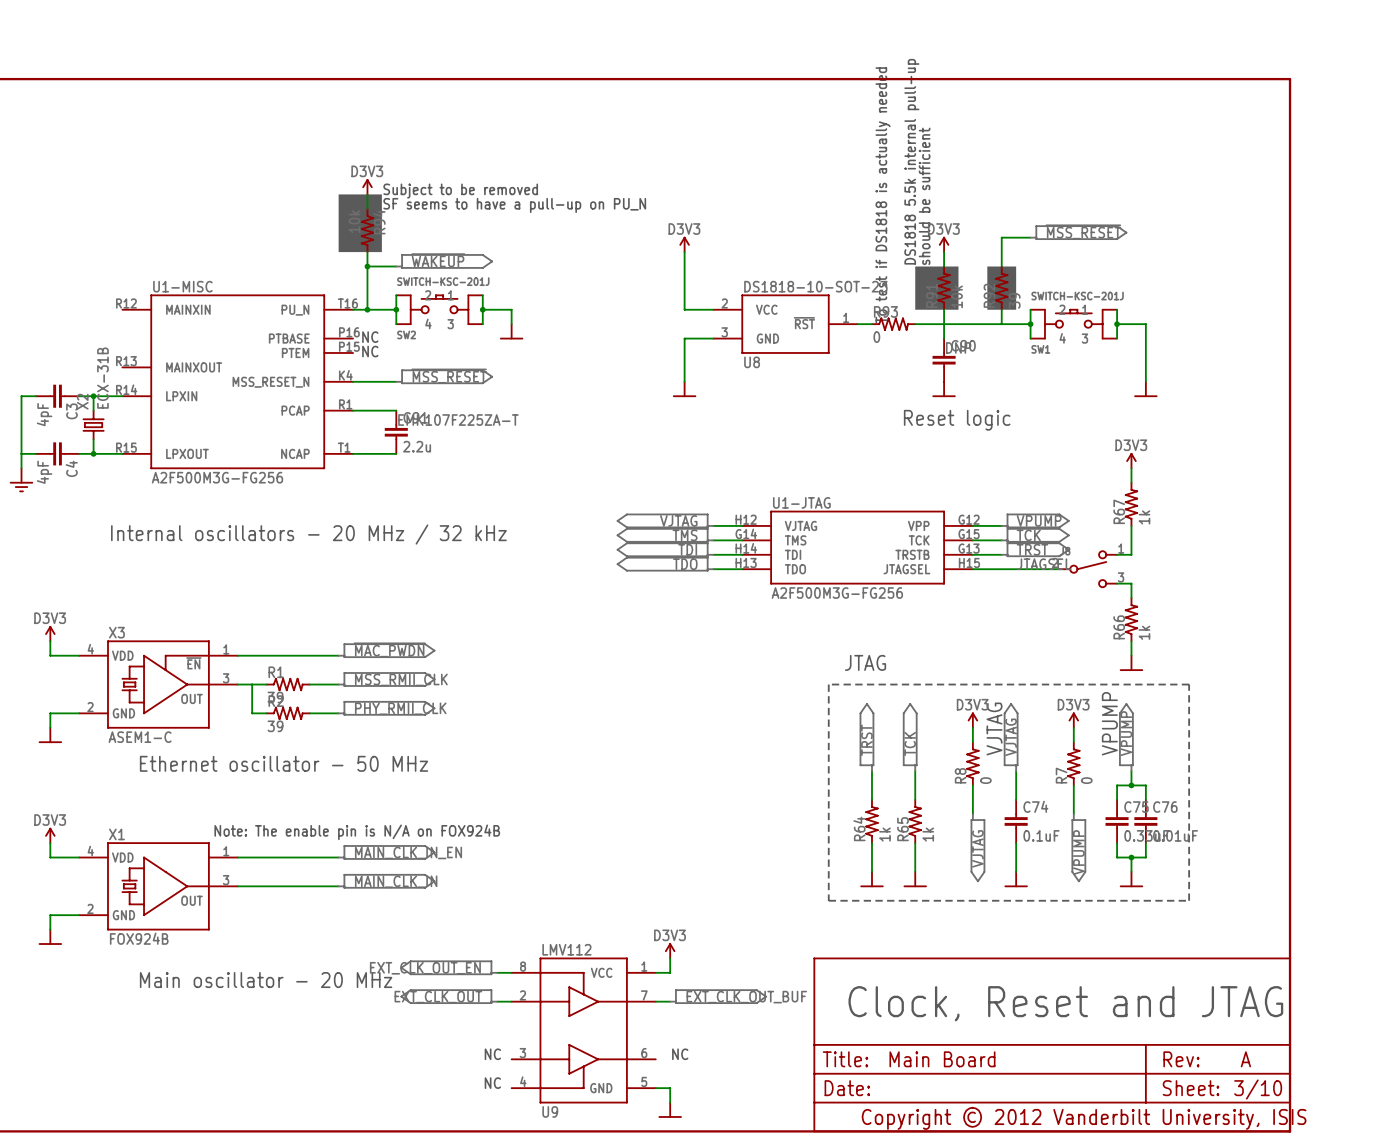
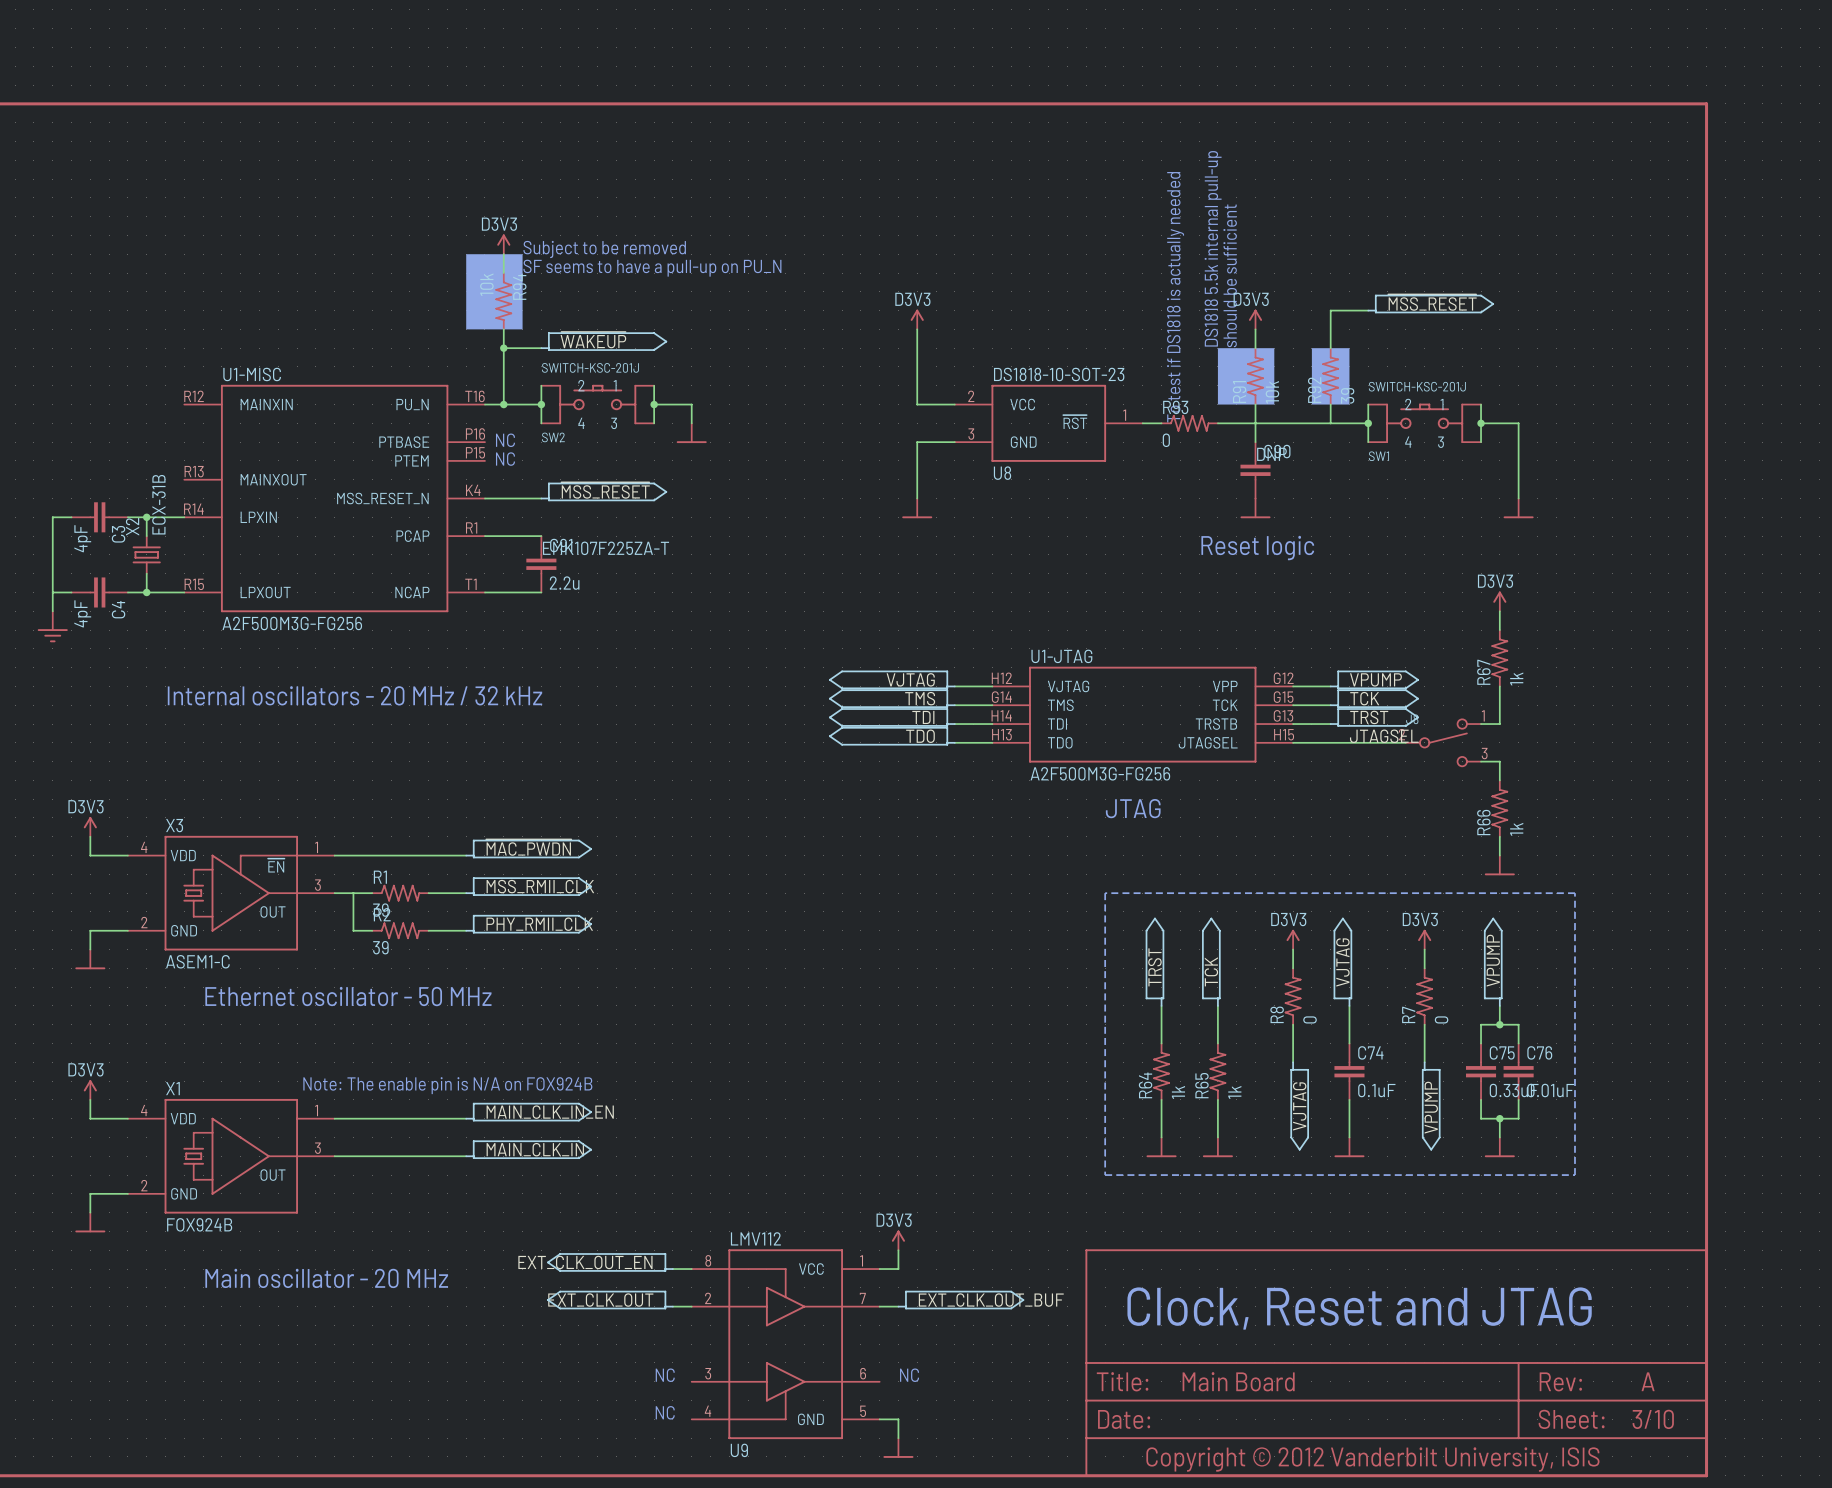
text position: JTAG (865, 662) -> JTAG (1133, 808)
text: VPUMP (1109, 723) -> none
text: VJTAG (994, 728) -> none

